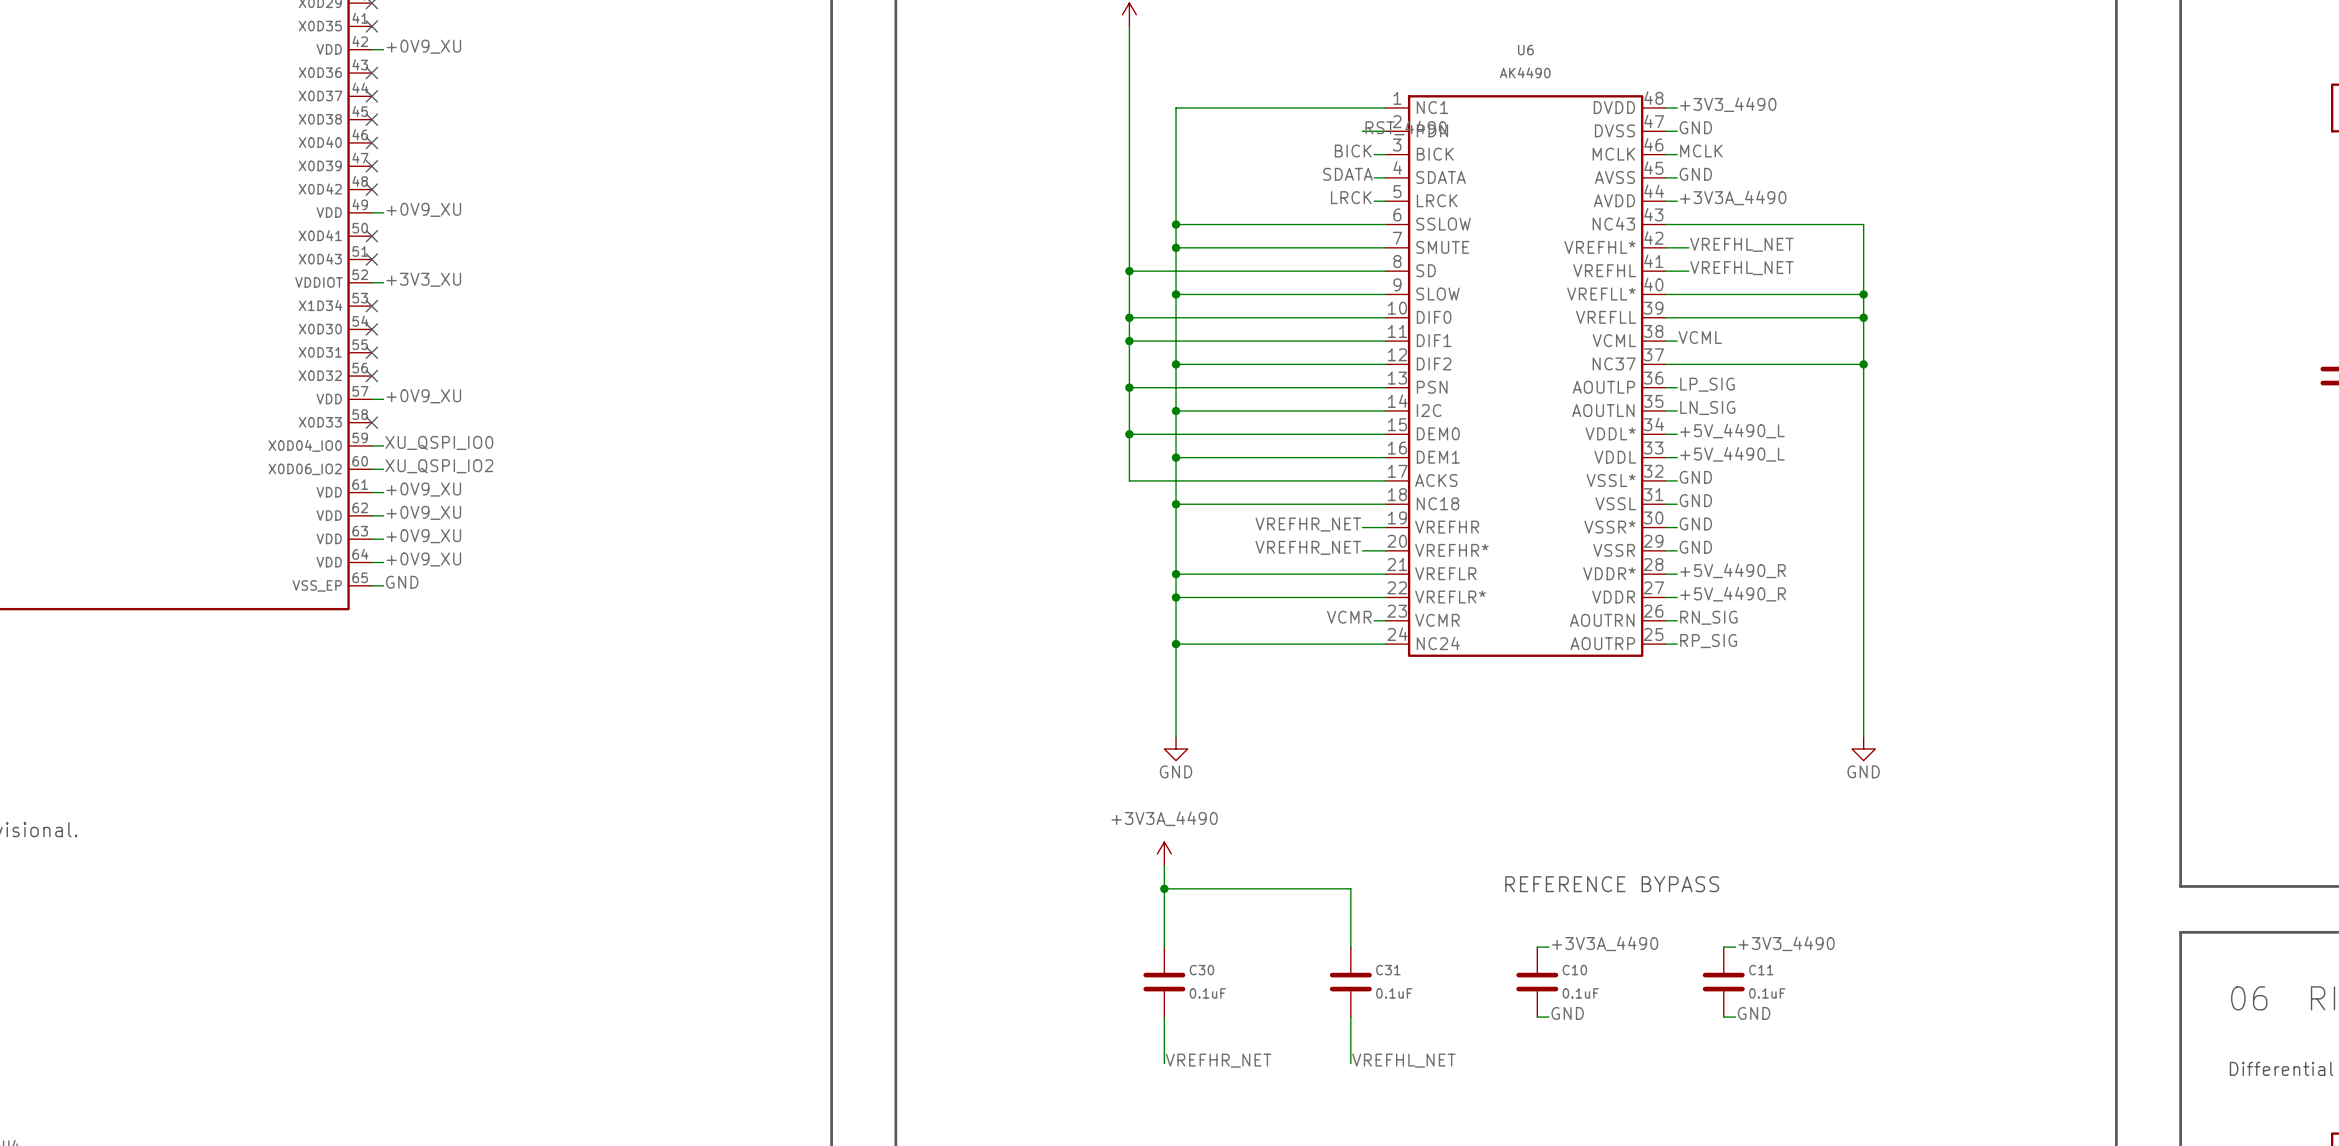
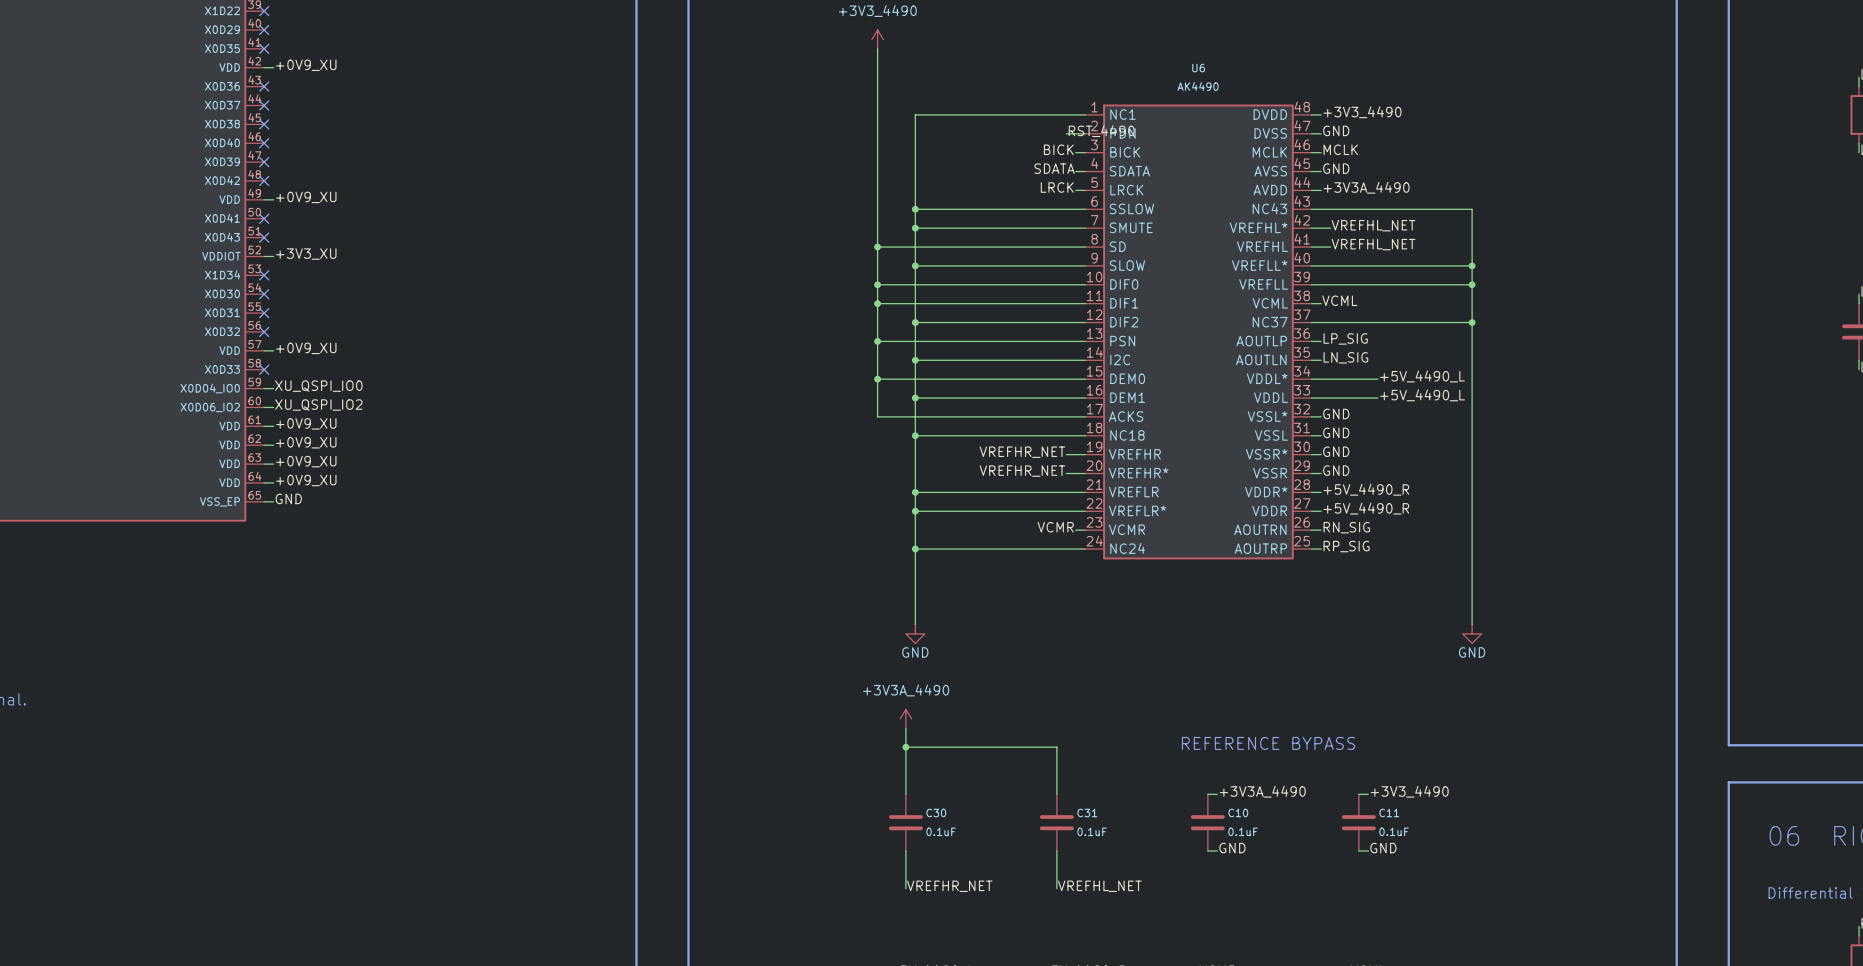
label: +5V_4490_L (1732, 431) -> none
label: none -> +5V_4490_L (1422, 376)
wire: none -> (1321, 379) (1377, 379)
label: +5V_4490_L (1732, 454) -> none
label: none -> +5V_4490_L (1422, 395)
wire: none -> (1321, 398) (1377, 398)

